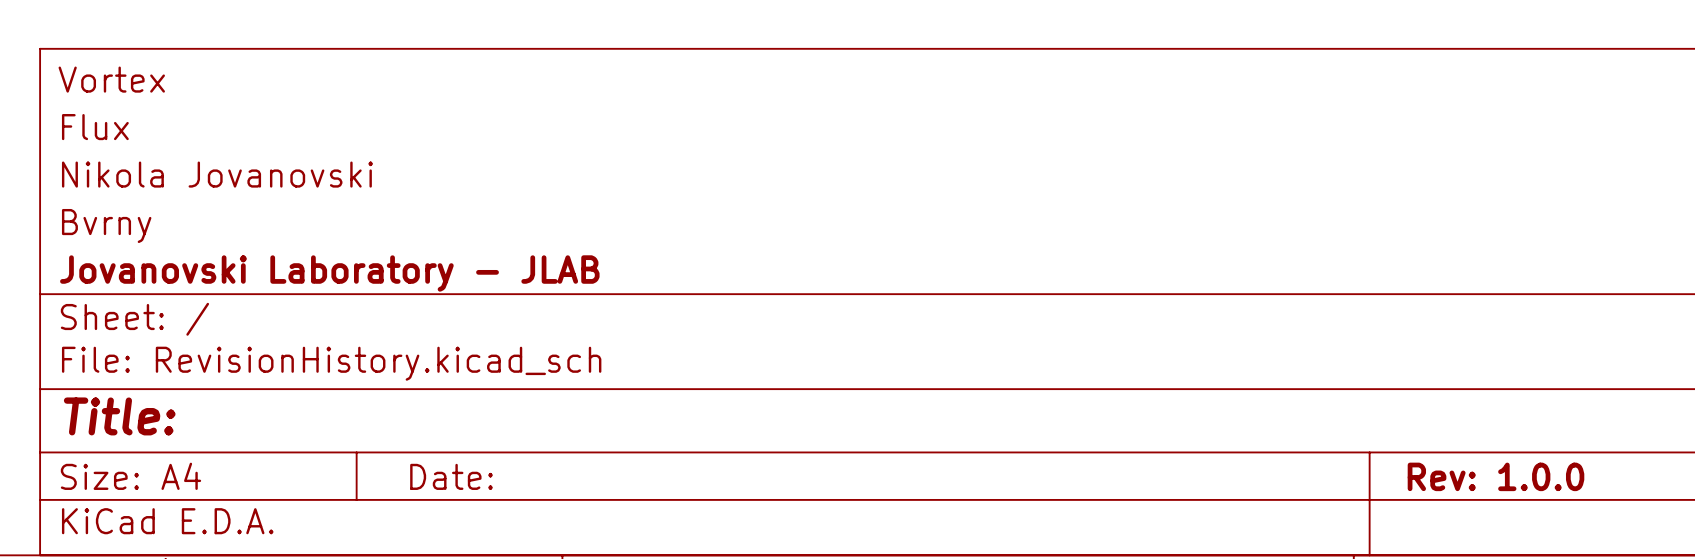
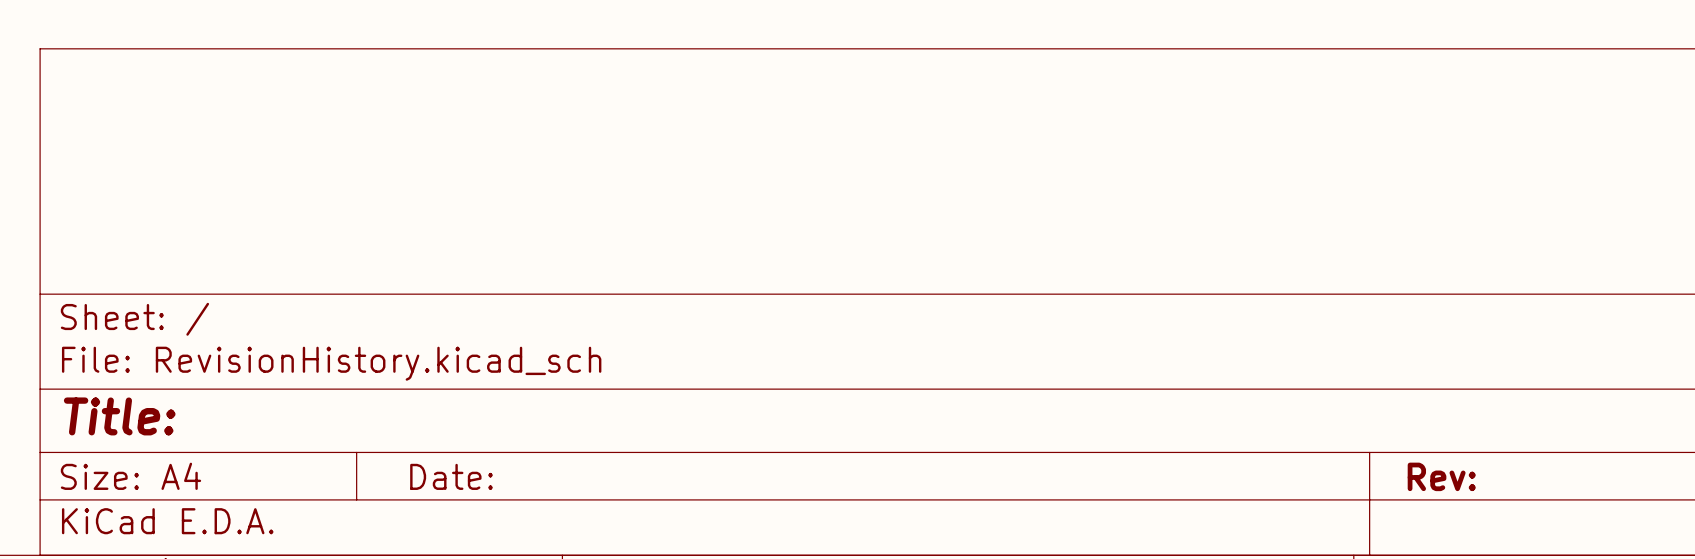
title block: Vortex (111, 79) -> none
title block: Flux (95, 127) -> none
title block: Nikola Jovanovski (217, 174) -> none
title block: Bvrny (106, 226) -> none
title block: Jovanovski Laboratory - JLAB (329, 273) -> none
title block: Rev: 1.0.0 (1495, 476) -> Rev: (1441, 476)

